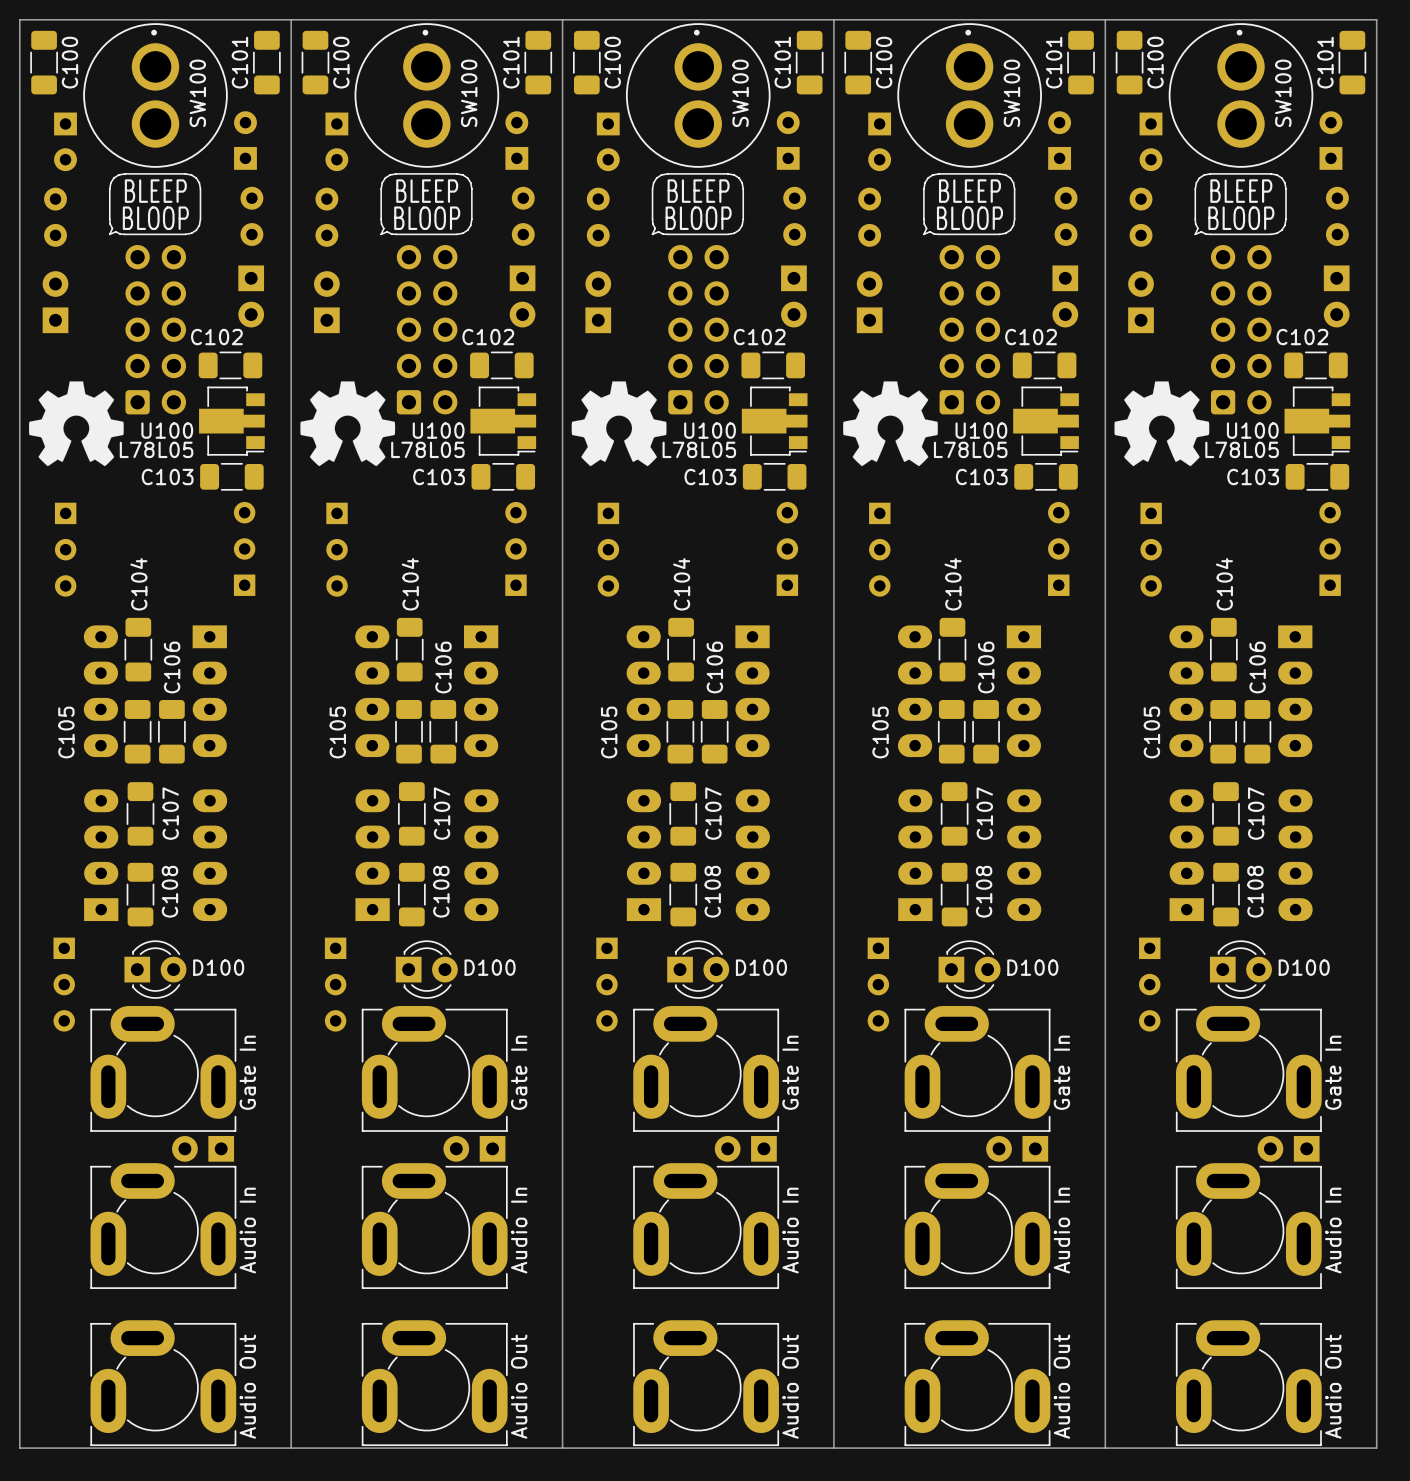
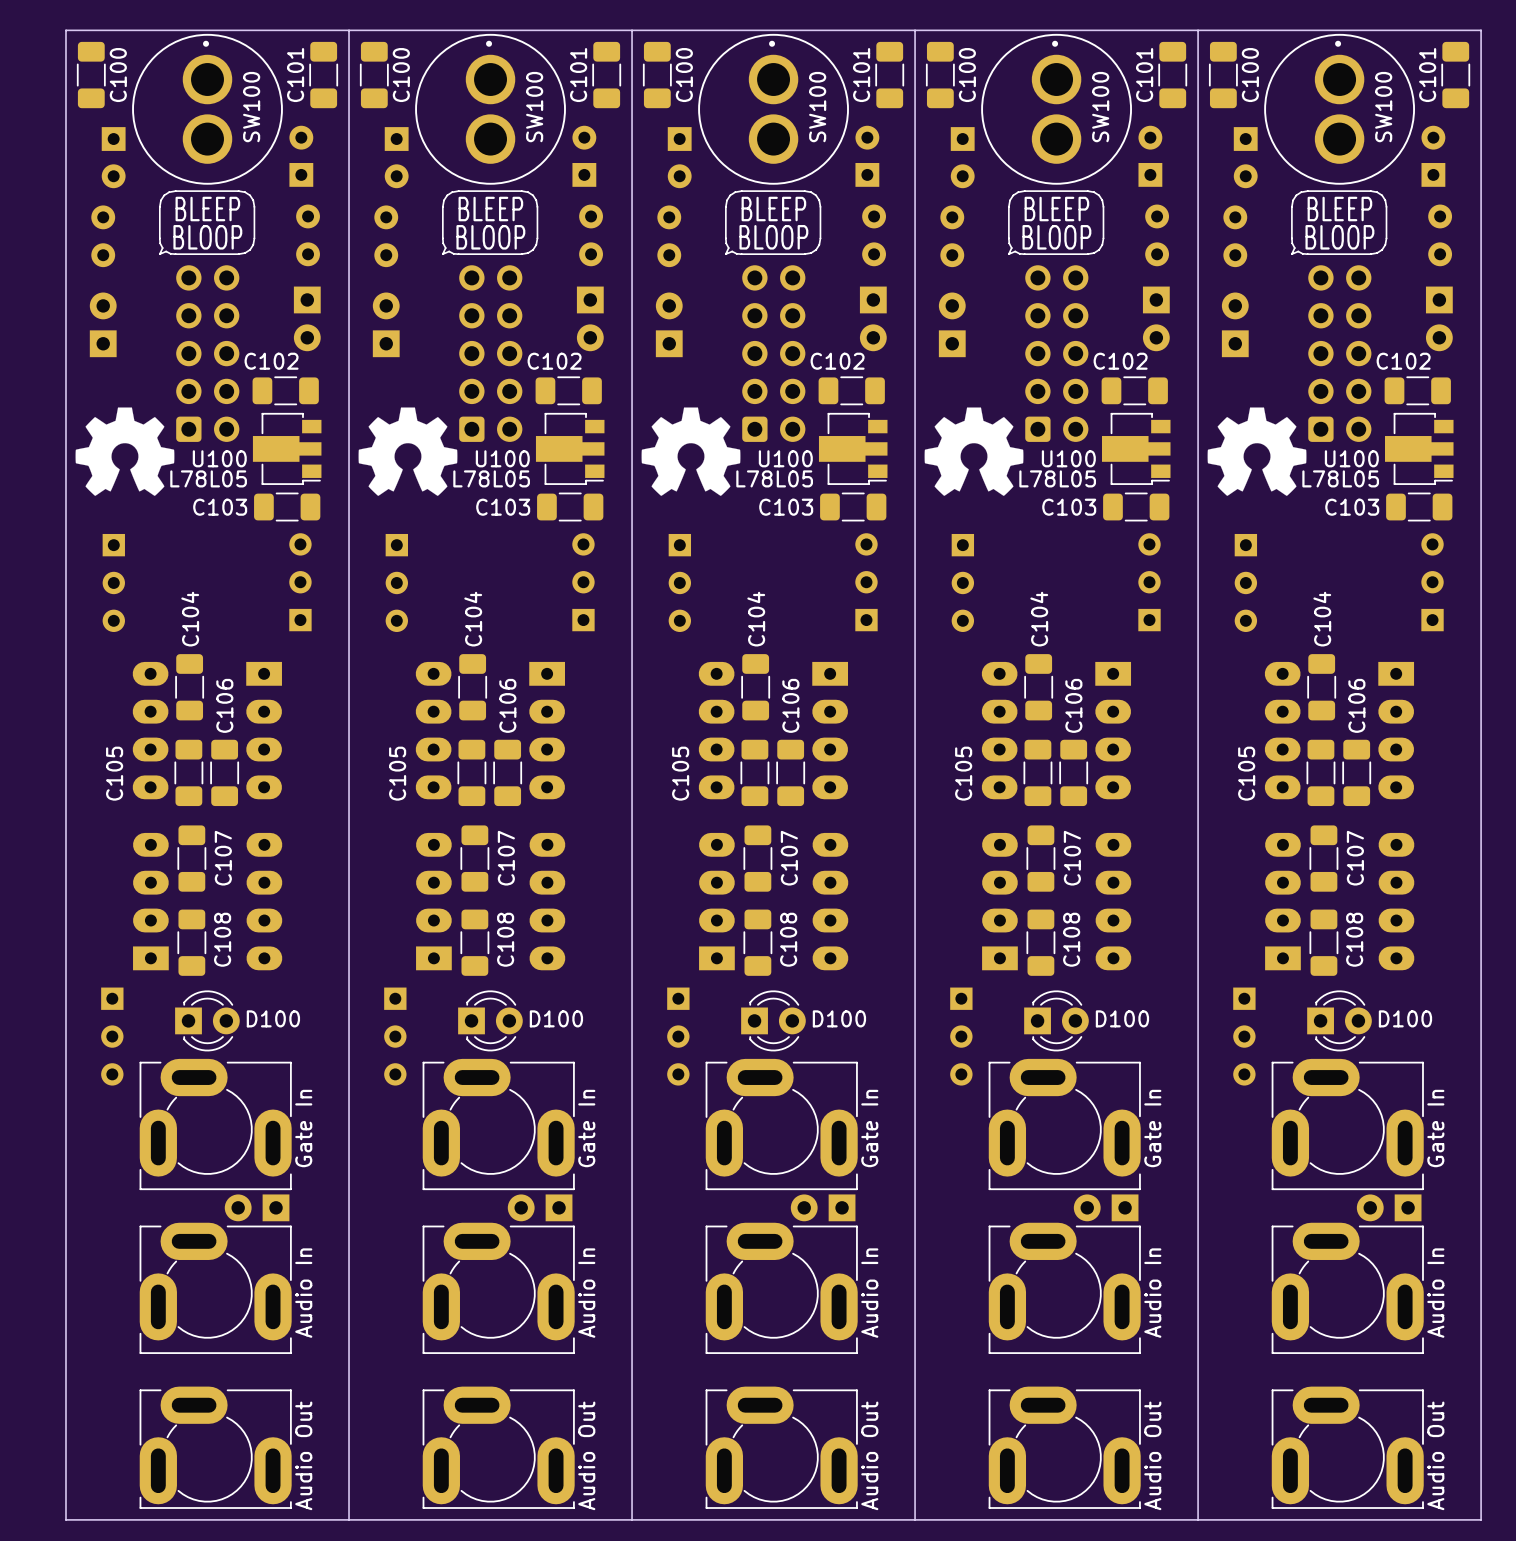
part footprint: [90, 1320, 237, 1447] -> [139, 1386, 292, 1509]
part footprint: [361, 1320, 508, 1447] -> [422, 1386, 575, 1509]
part footprint: [633, 1320, 780, 1447] -> [705, 1386, 858, 1509]
part footprint: [904, 1320, 1051, 1447] -> [988, 1386, 1141, 1509]
part footprint: [1175, 1320, 1322, 1447] -> [1271, 1386, 1424, 1509]

